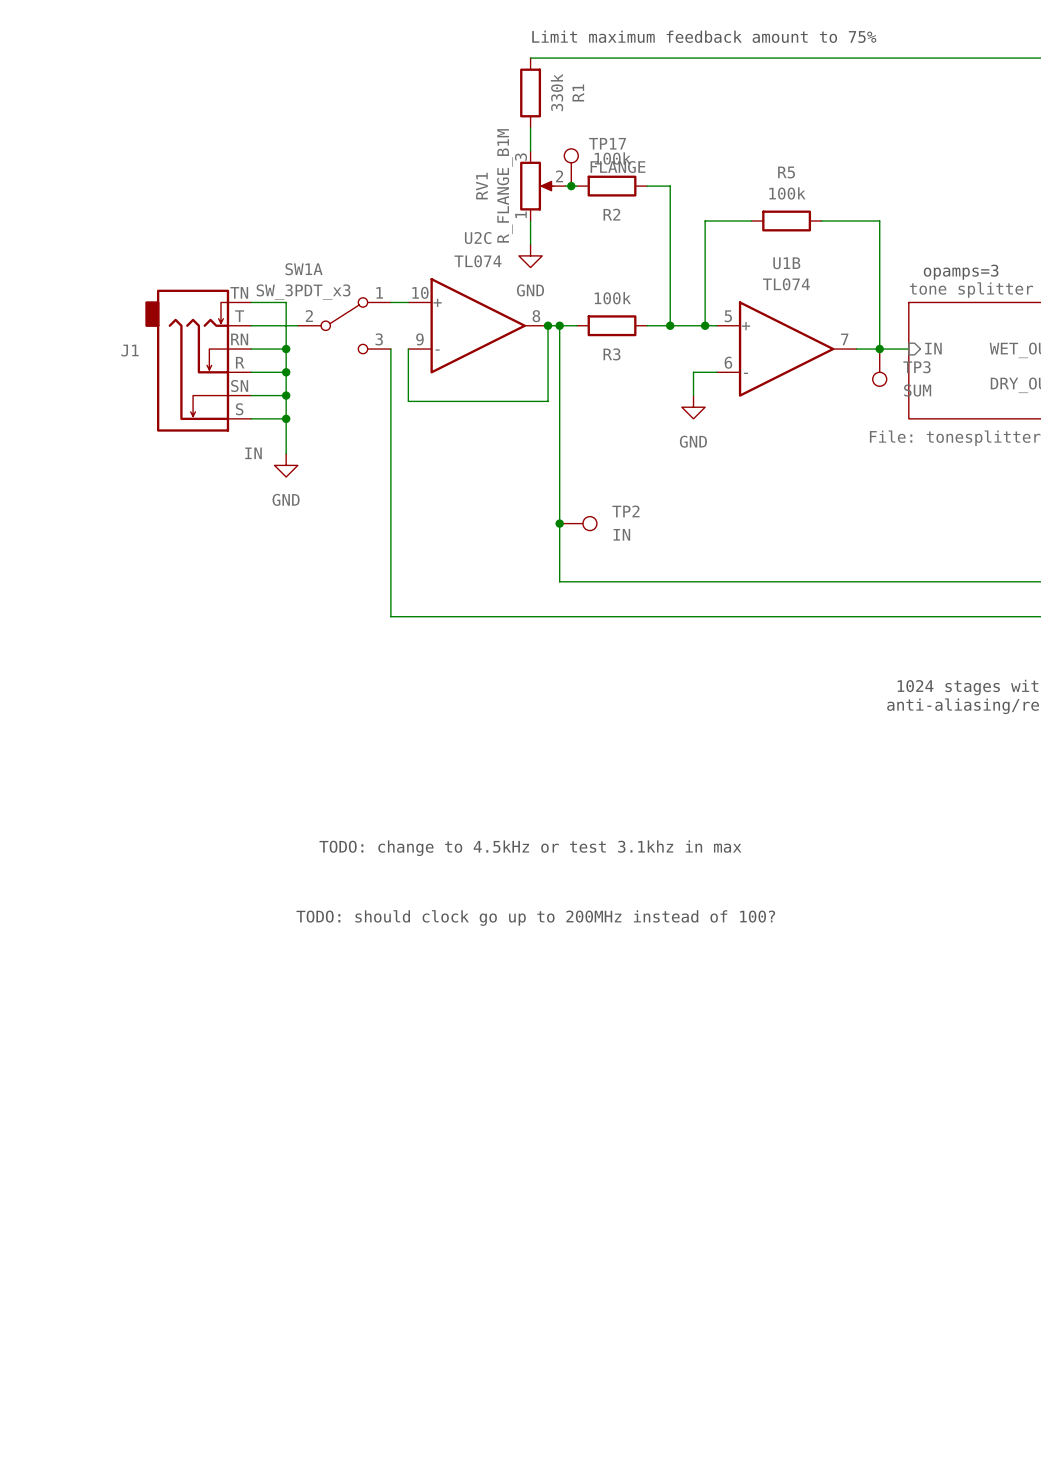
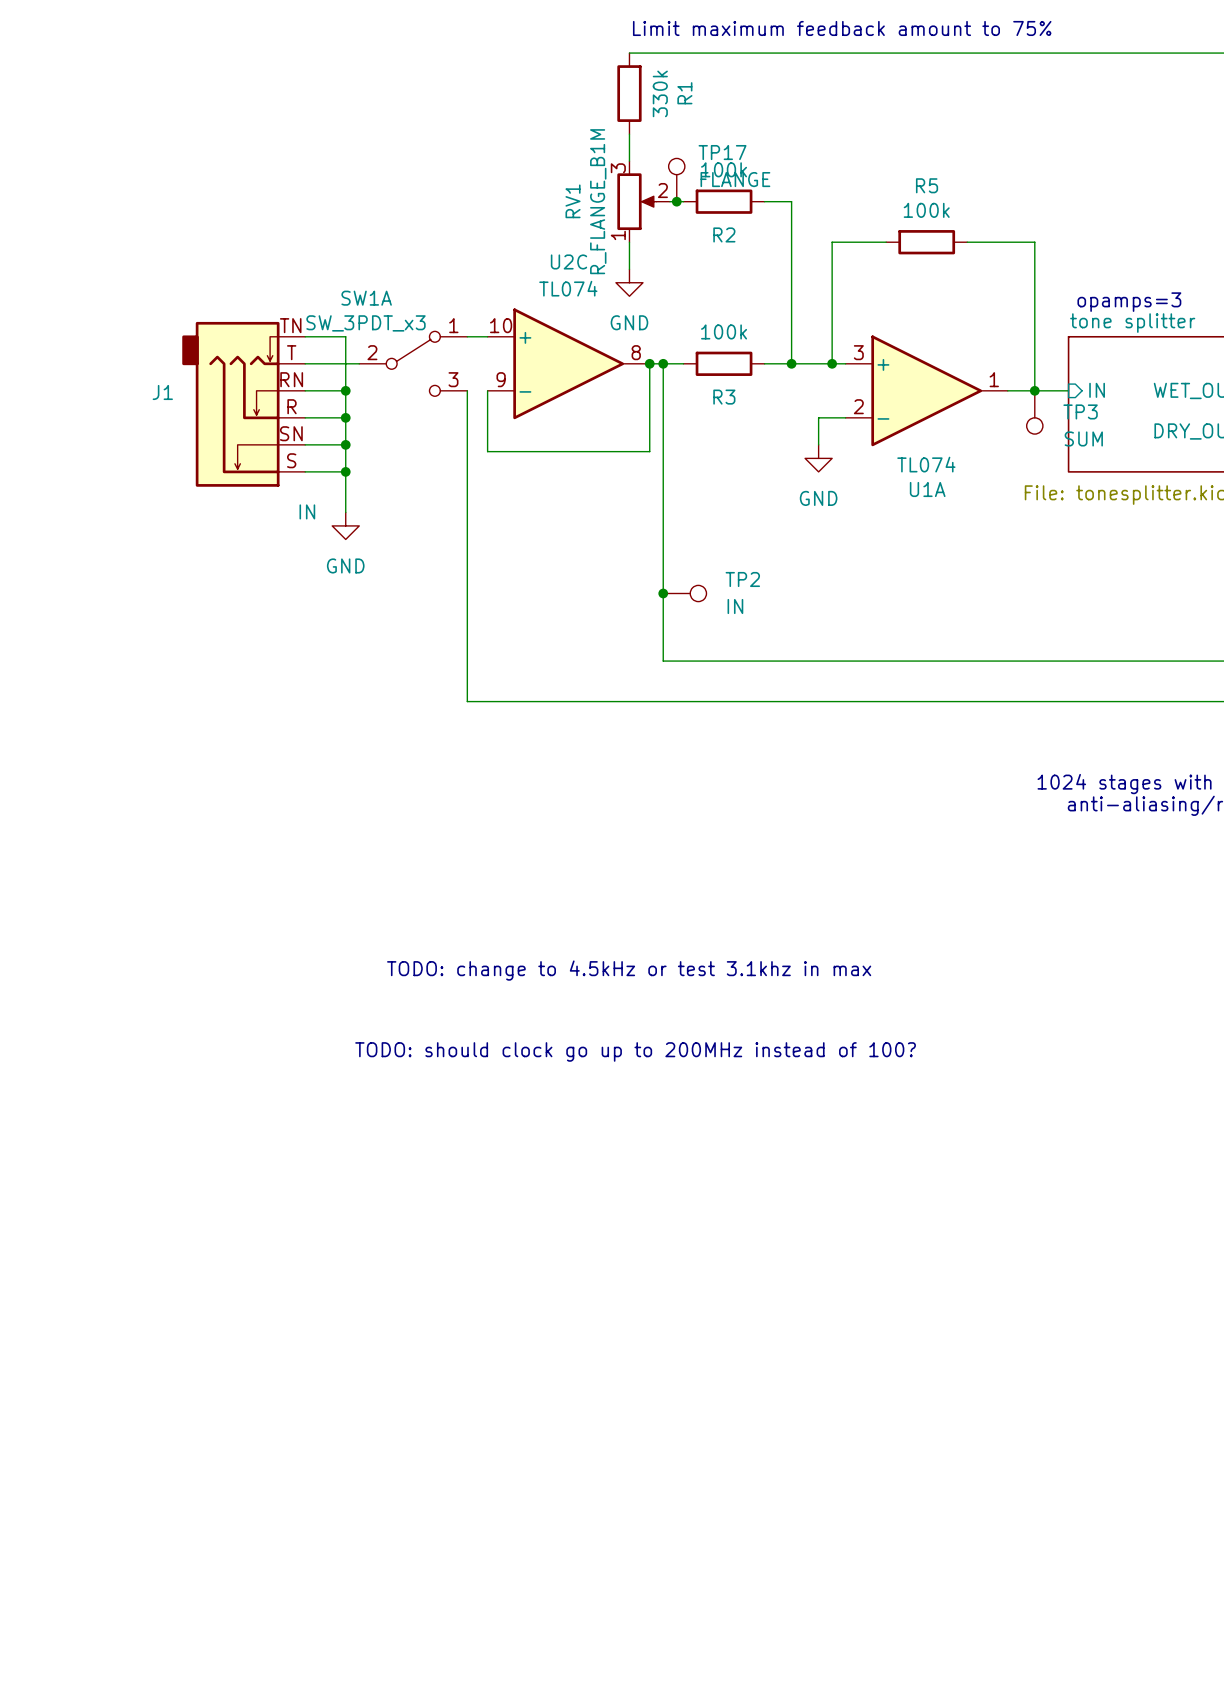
U1B name: U1B (786, 263) -> U1A (927, 489)
U1B value position: TL074 (786, 284) -> TL074 (926, 464)
U1B pin number: 5 (728, 316) -> 3 (858, 352)
U1B pin number: 7 (844, 339) -> 1 (994, 379)
U1B pin number: 6 (728, 362) -> 2 (858, 406)

